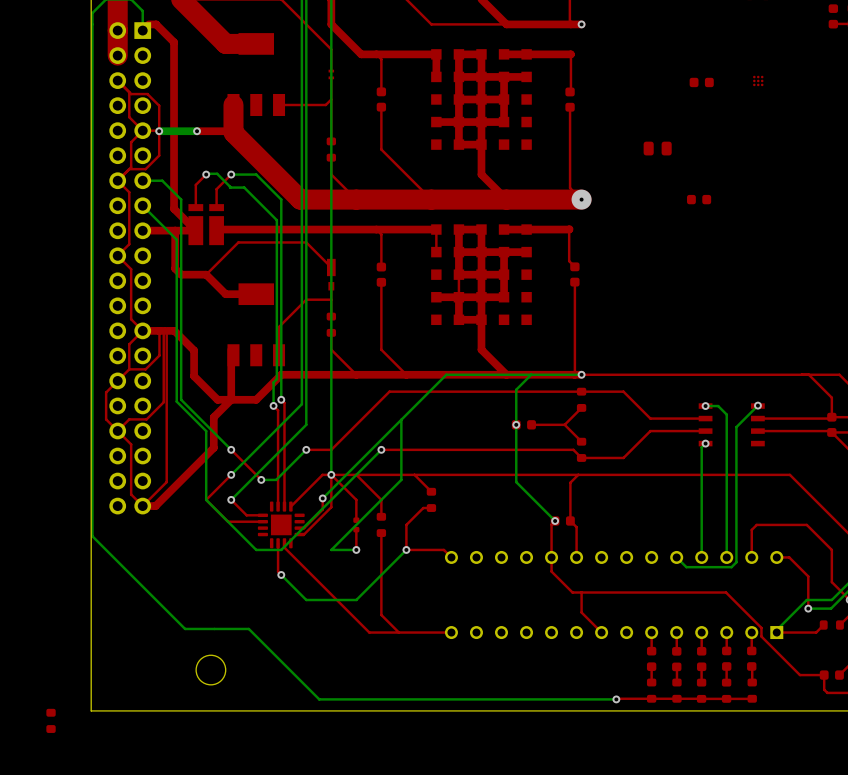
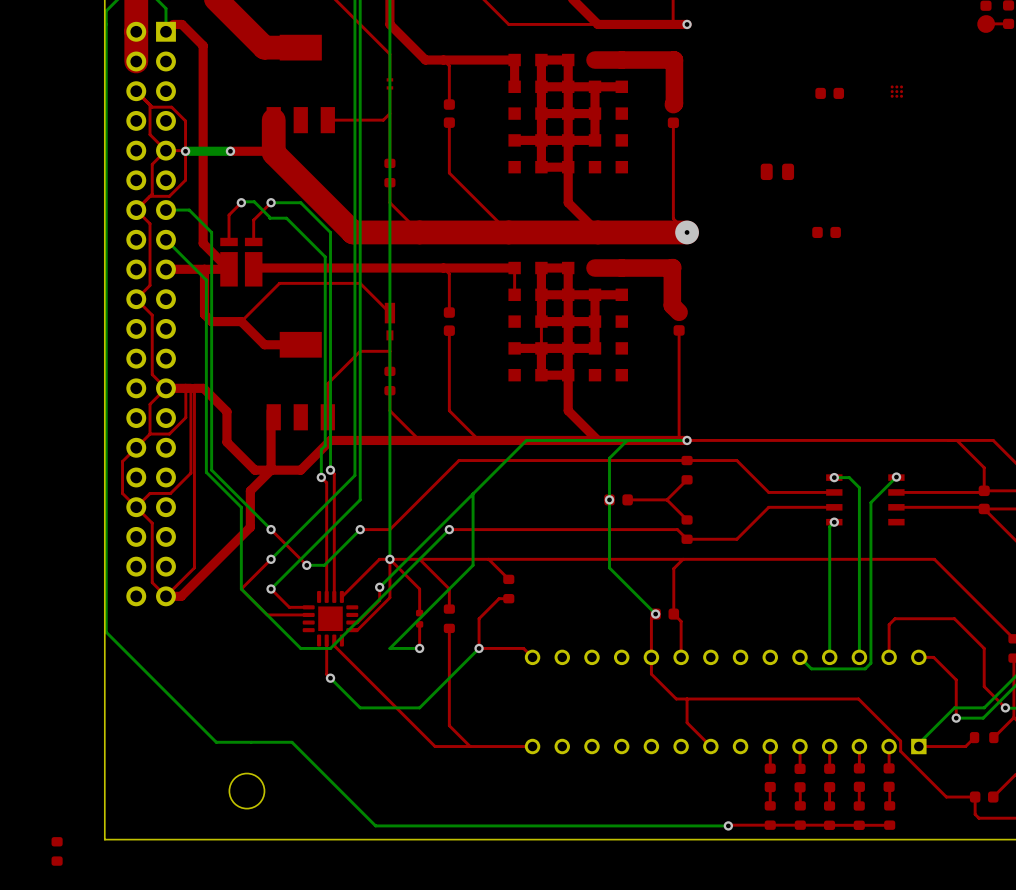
top track width: thin (570, 54) (504, 54) -> thick (674, 60) (595, 60)
top track width: thin (570, 54) (570, 91) -> thick (674, 60) (673, 104)
top track width: thin (504, 229) (569, 229) (569, 261) (574, 266) -> thick (595, 268) (672, 268) (672, 305) (679, 312)

